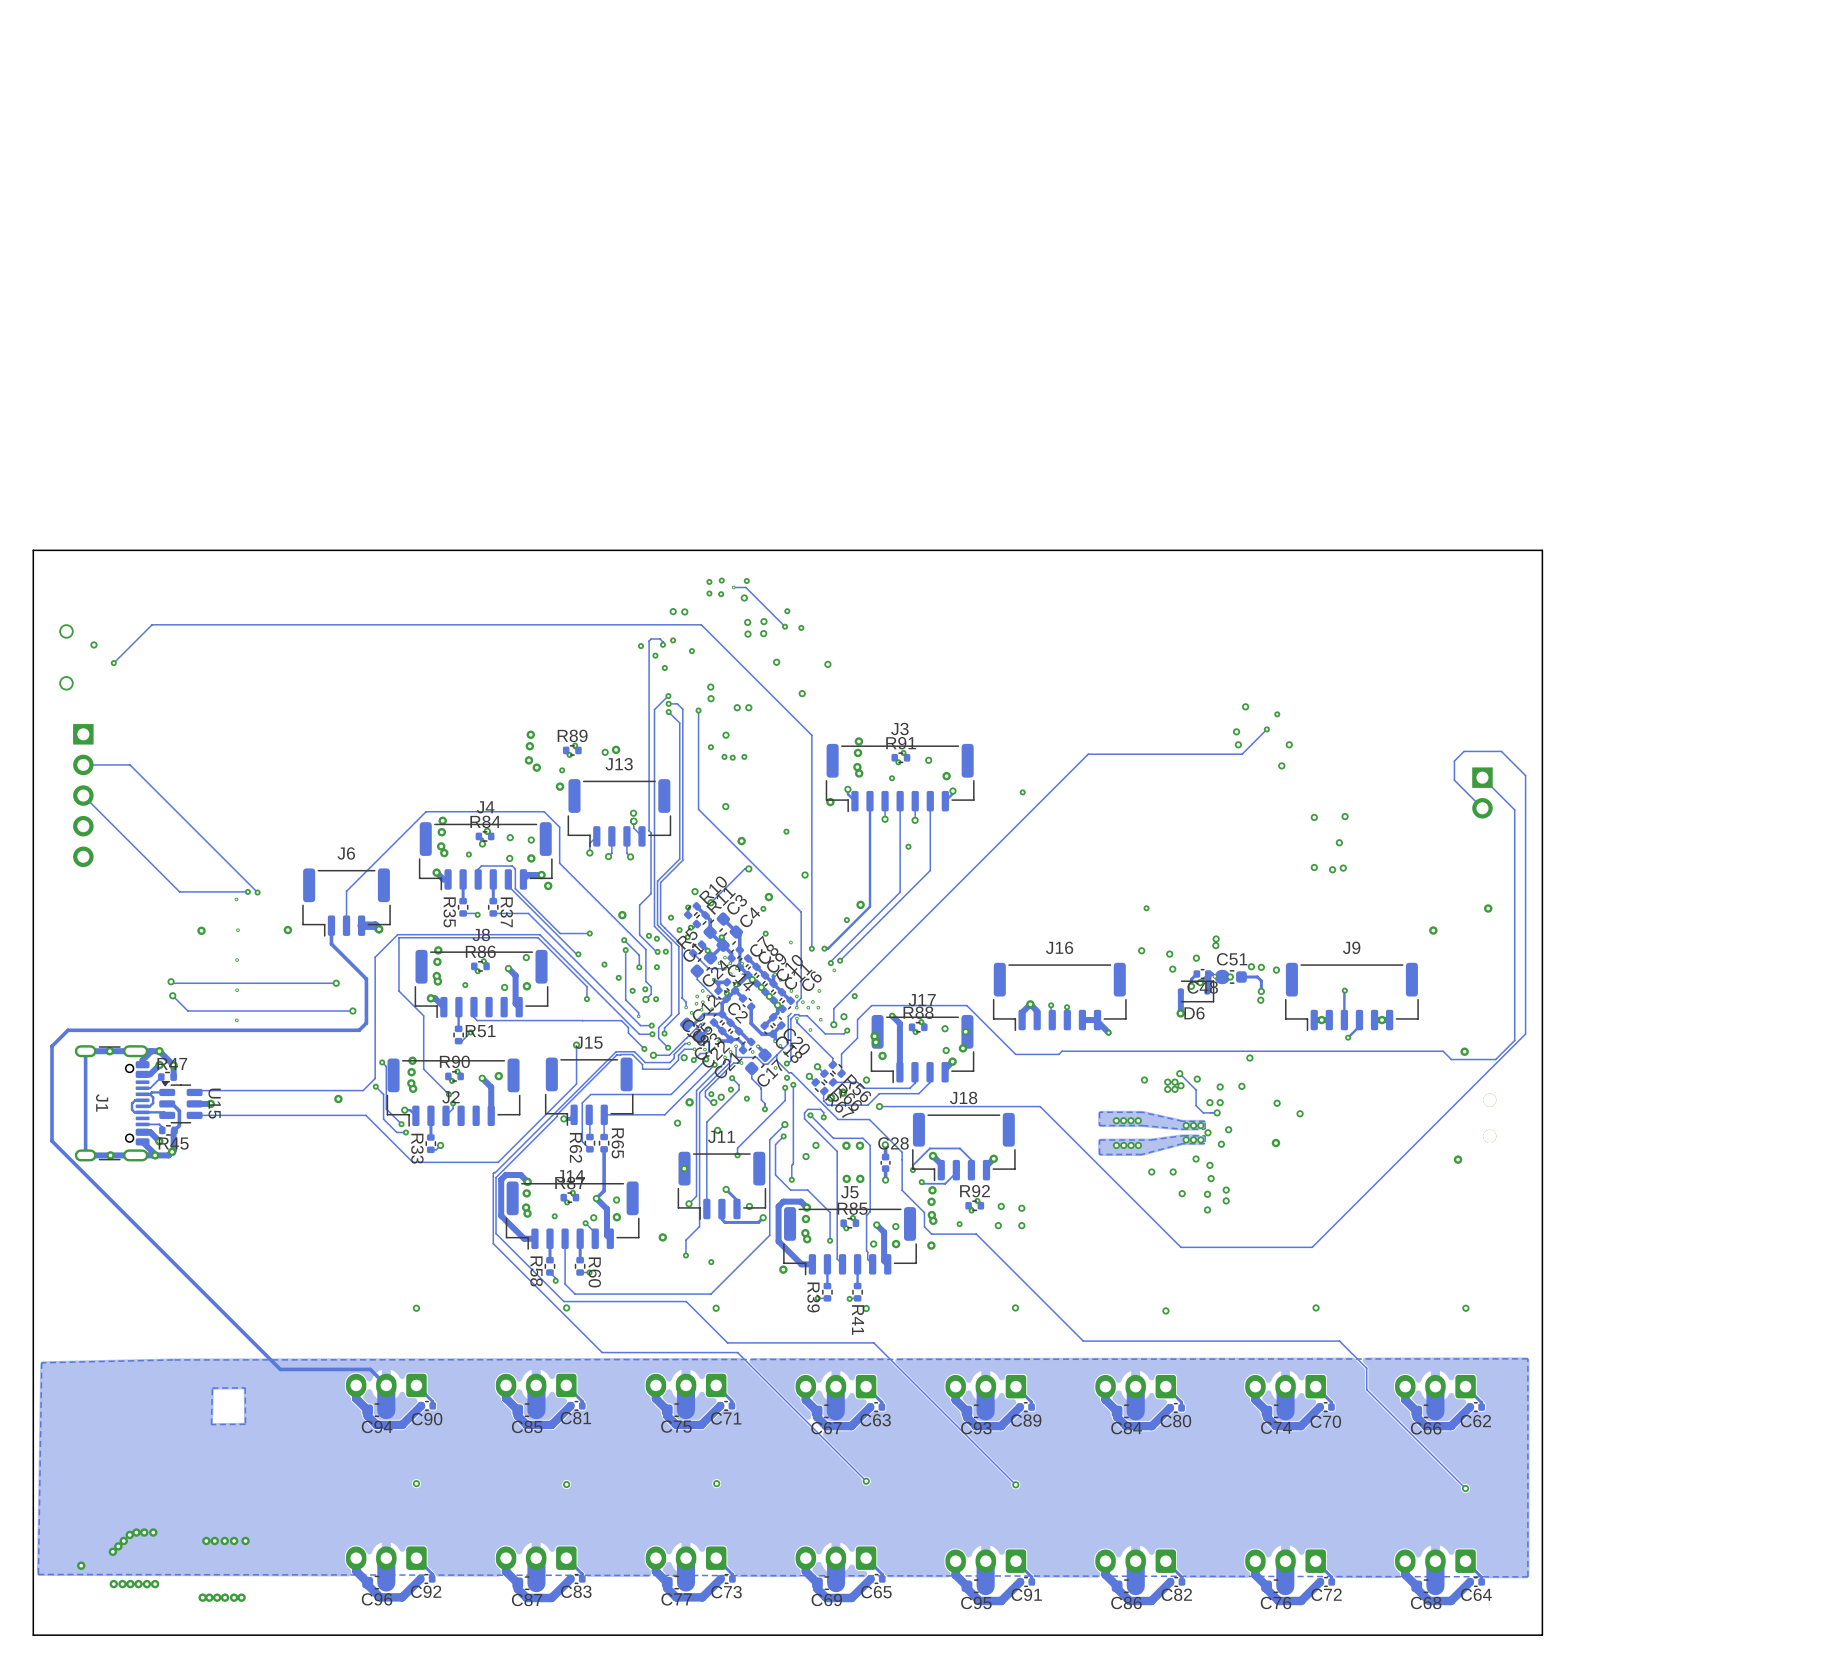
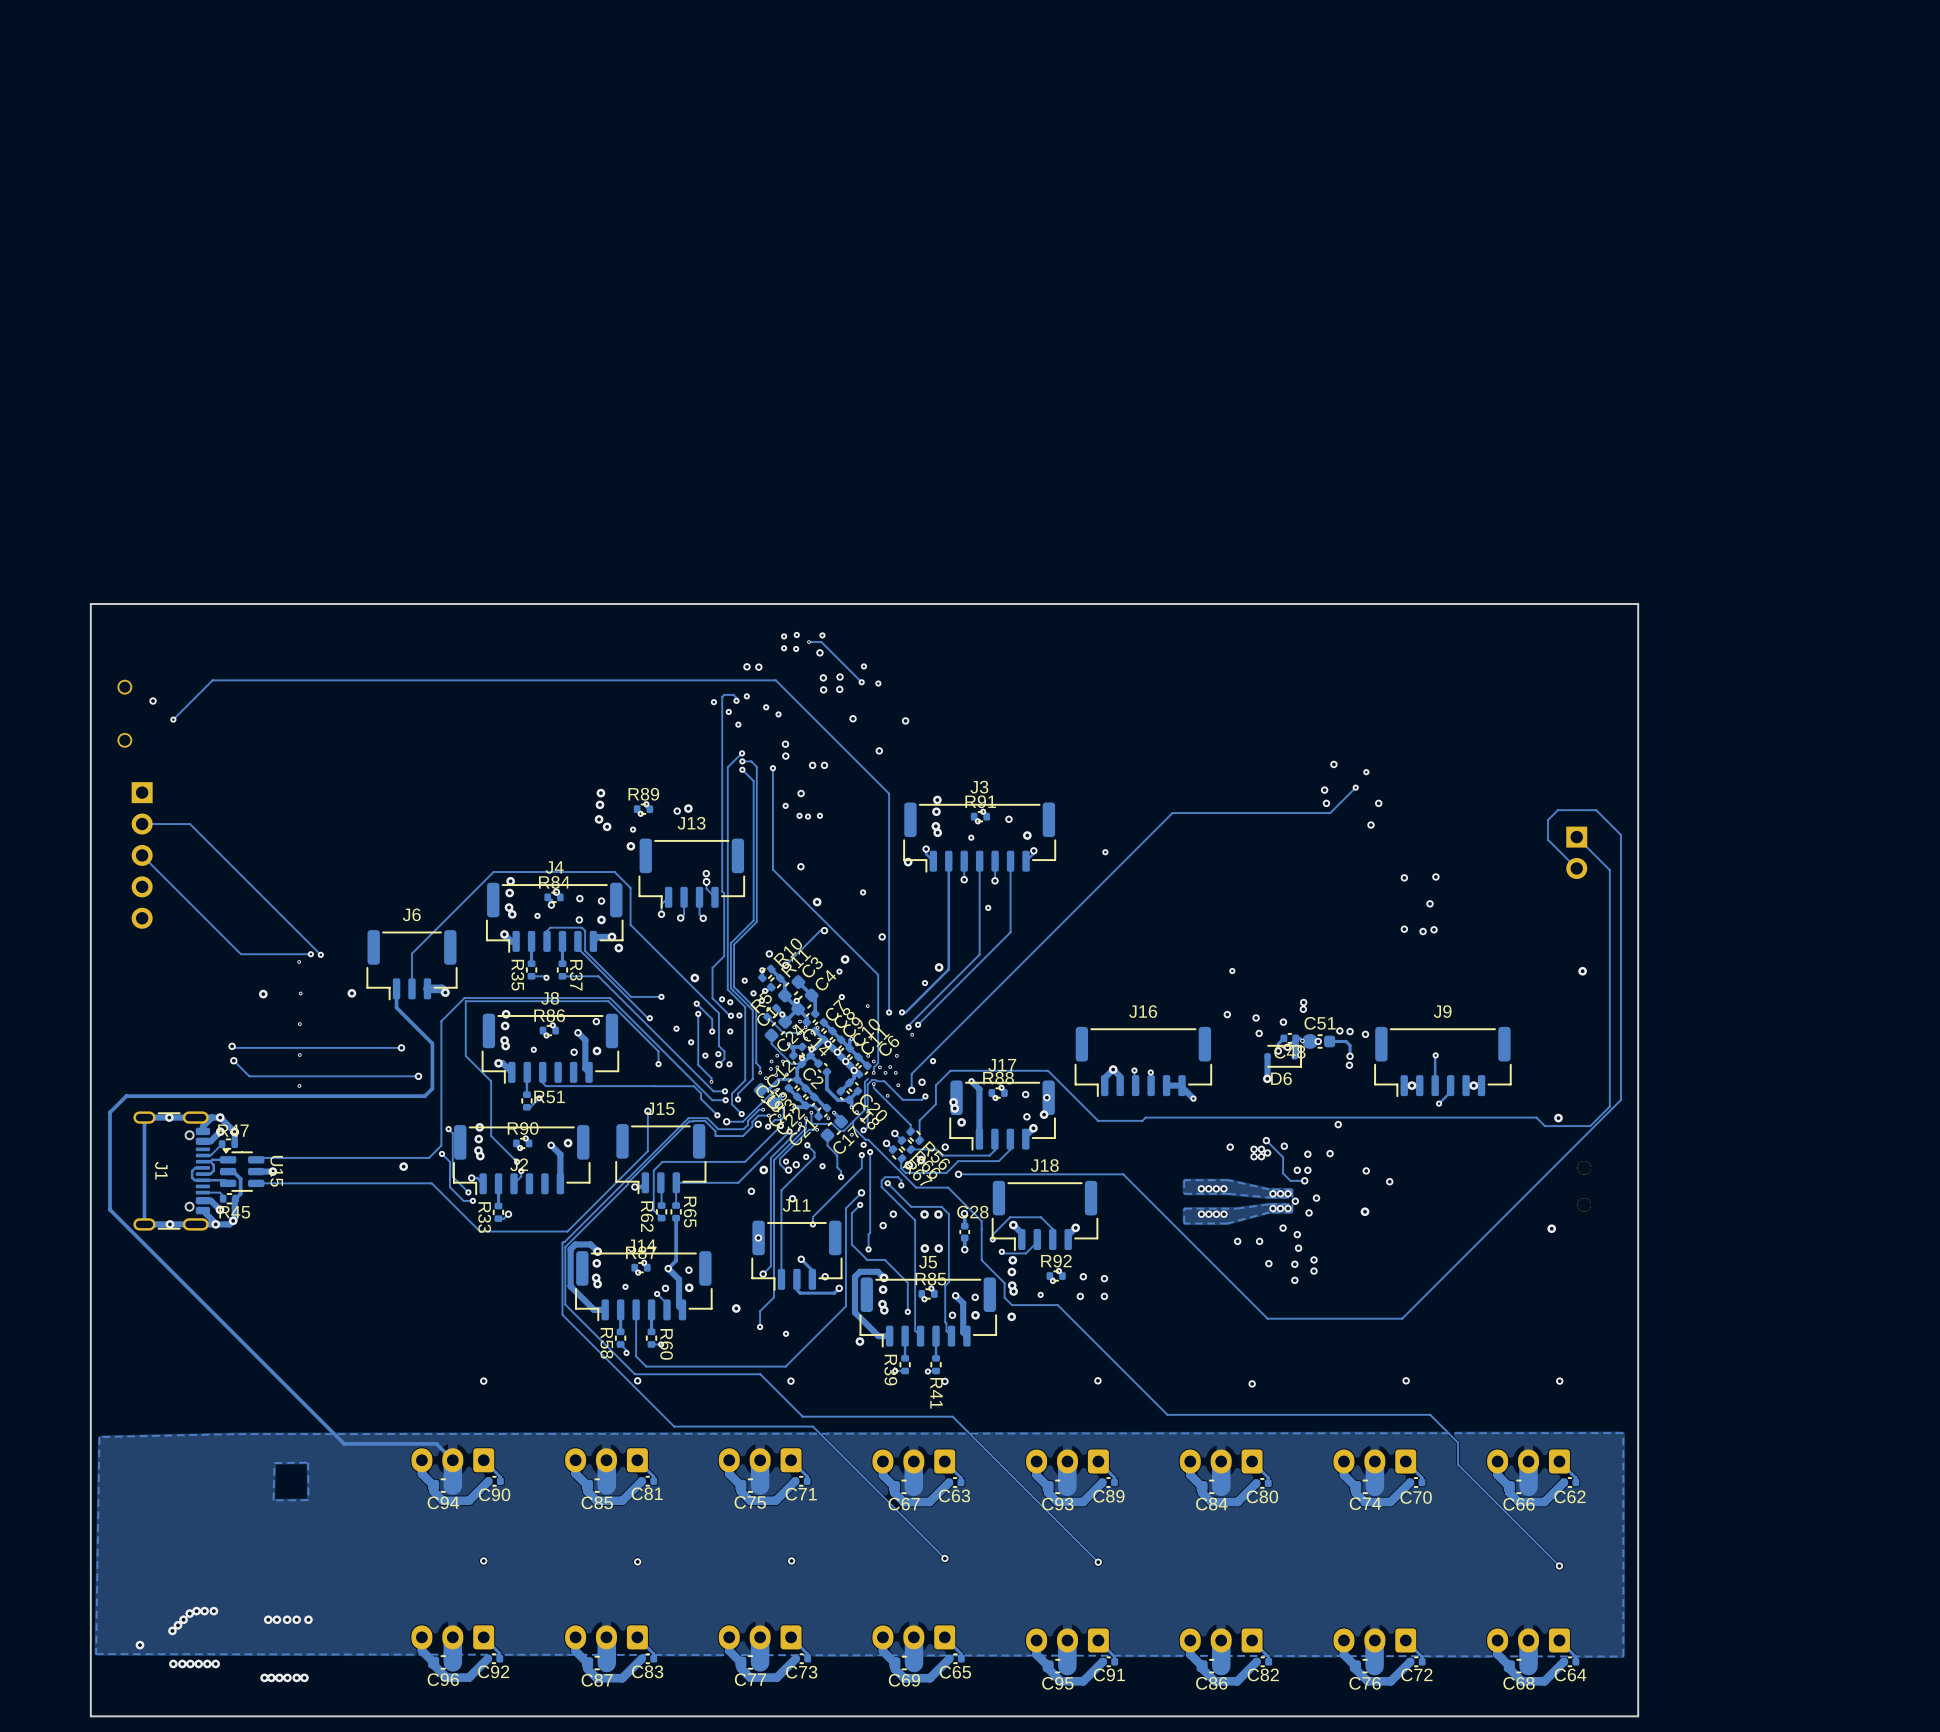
via: none -> (778, 714)
via: (1433, 930) -> none
track: (739, 950) (739, 966) -> none

